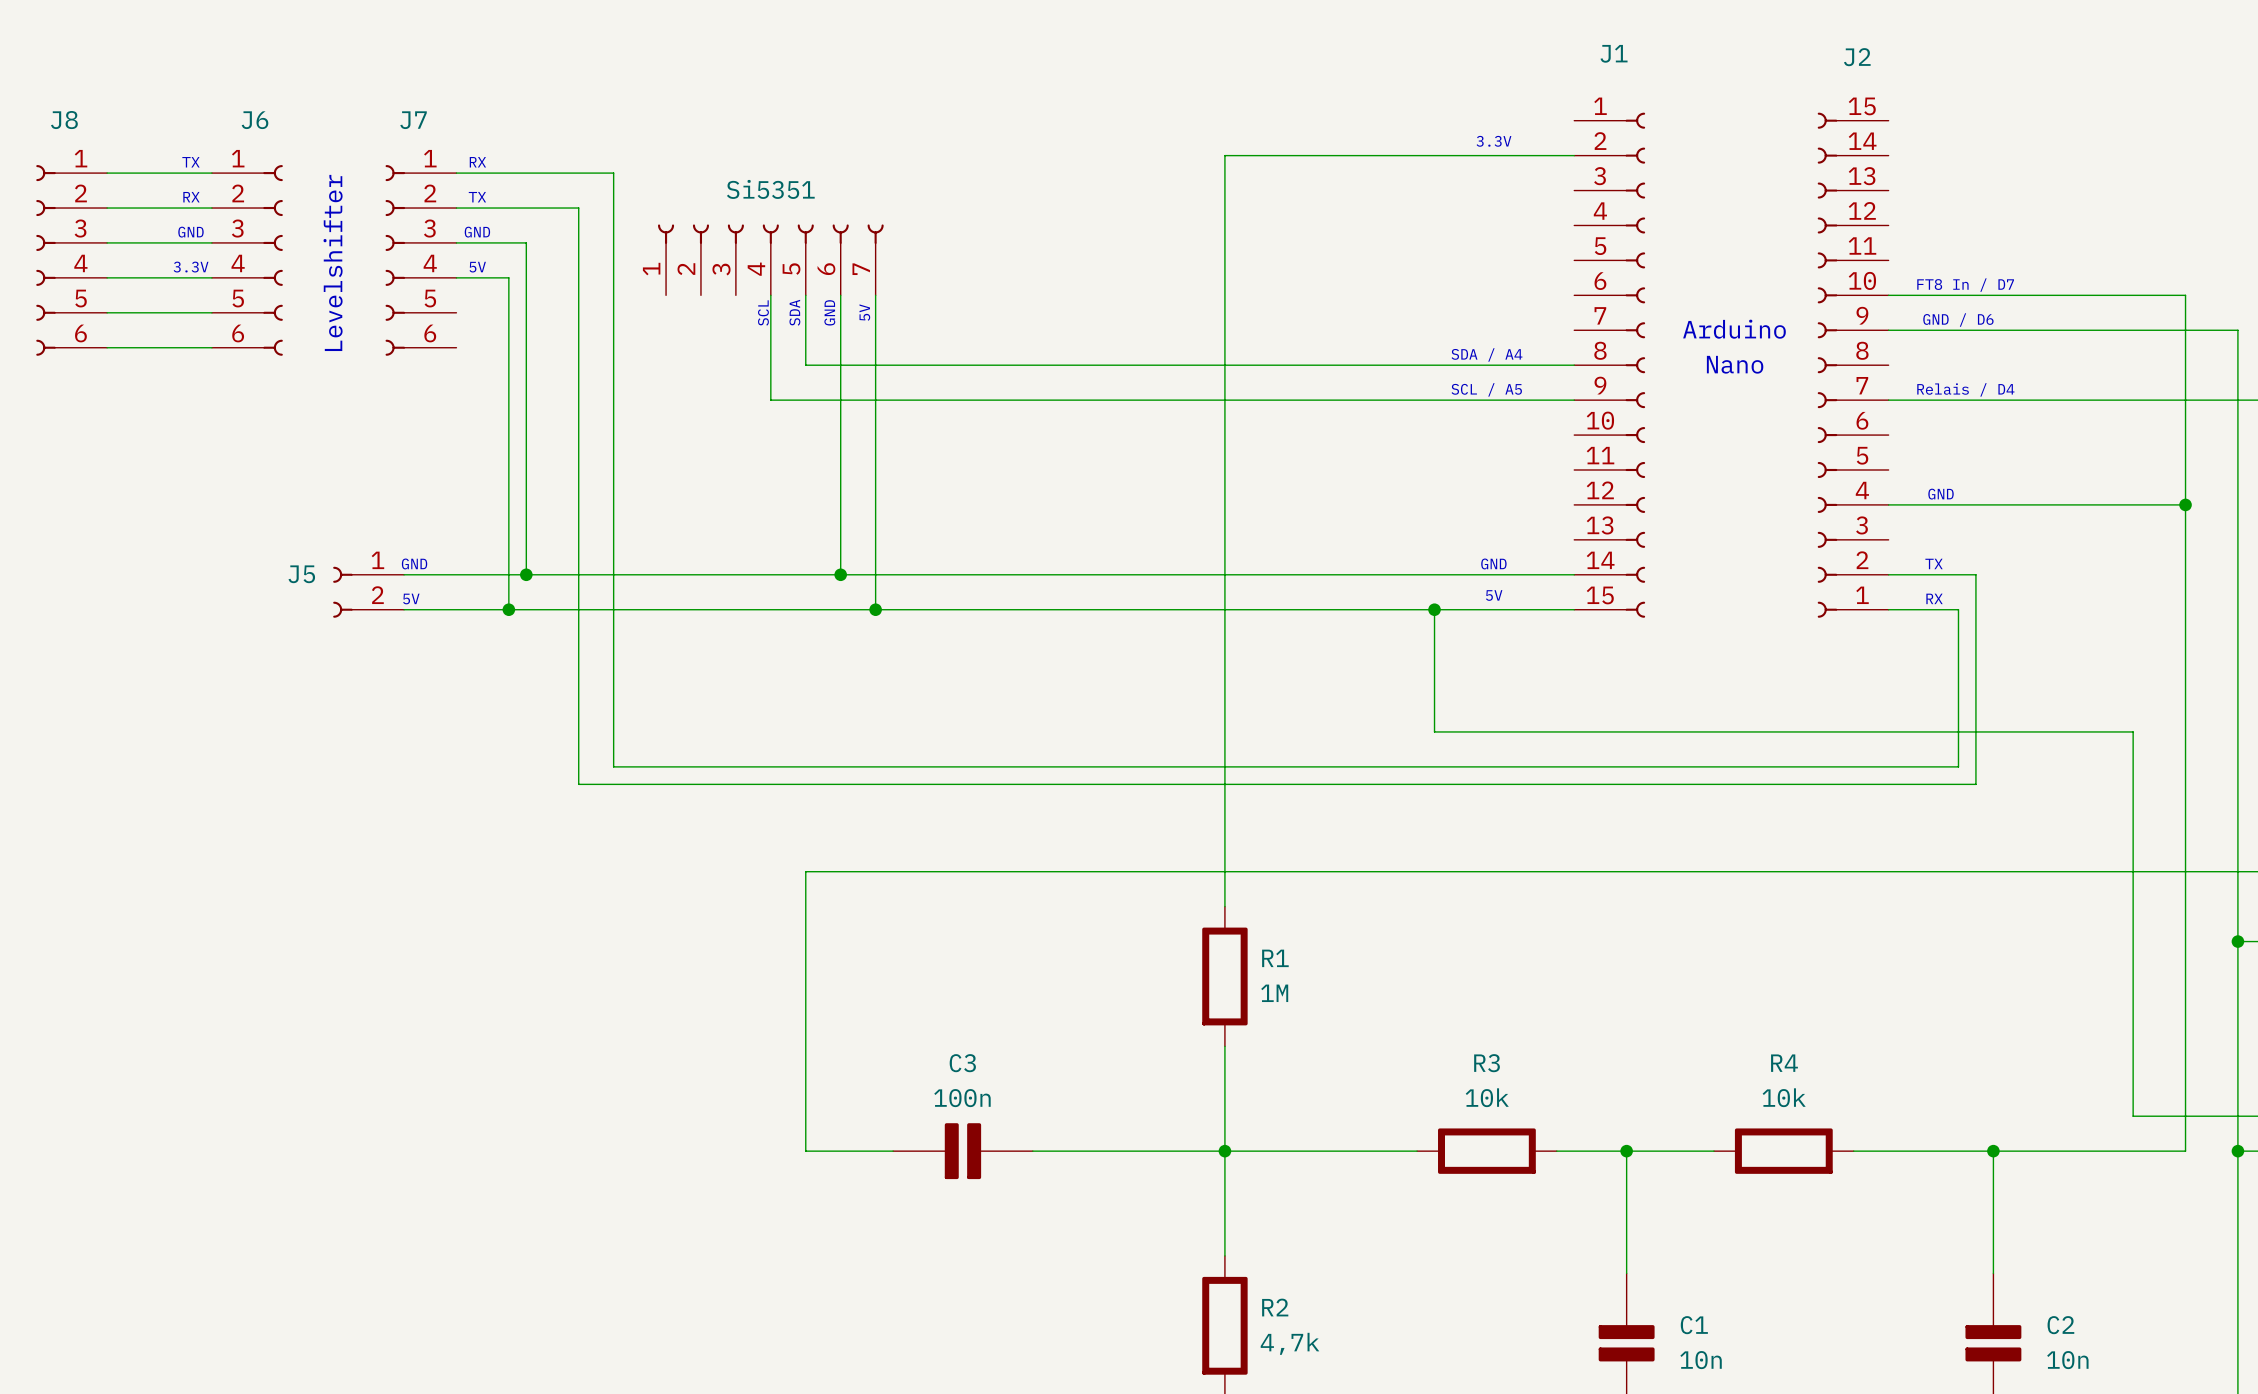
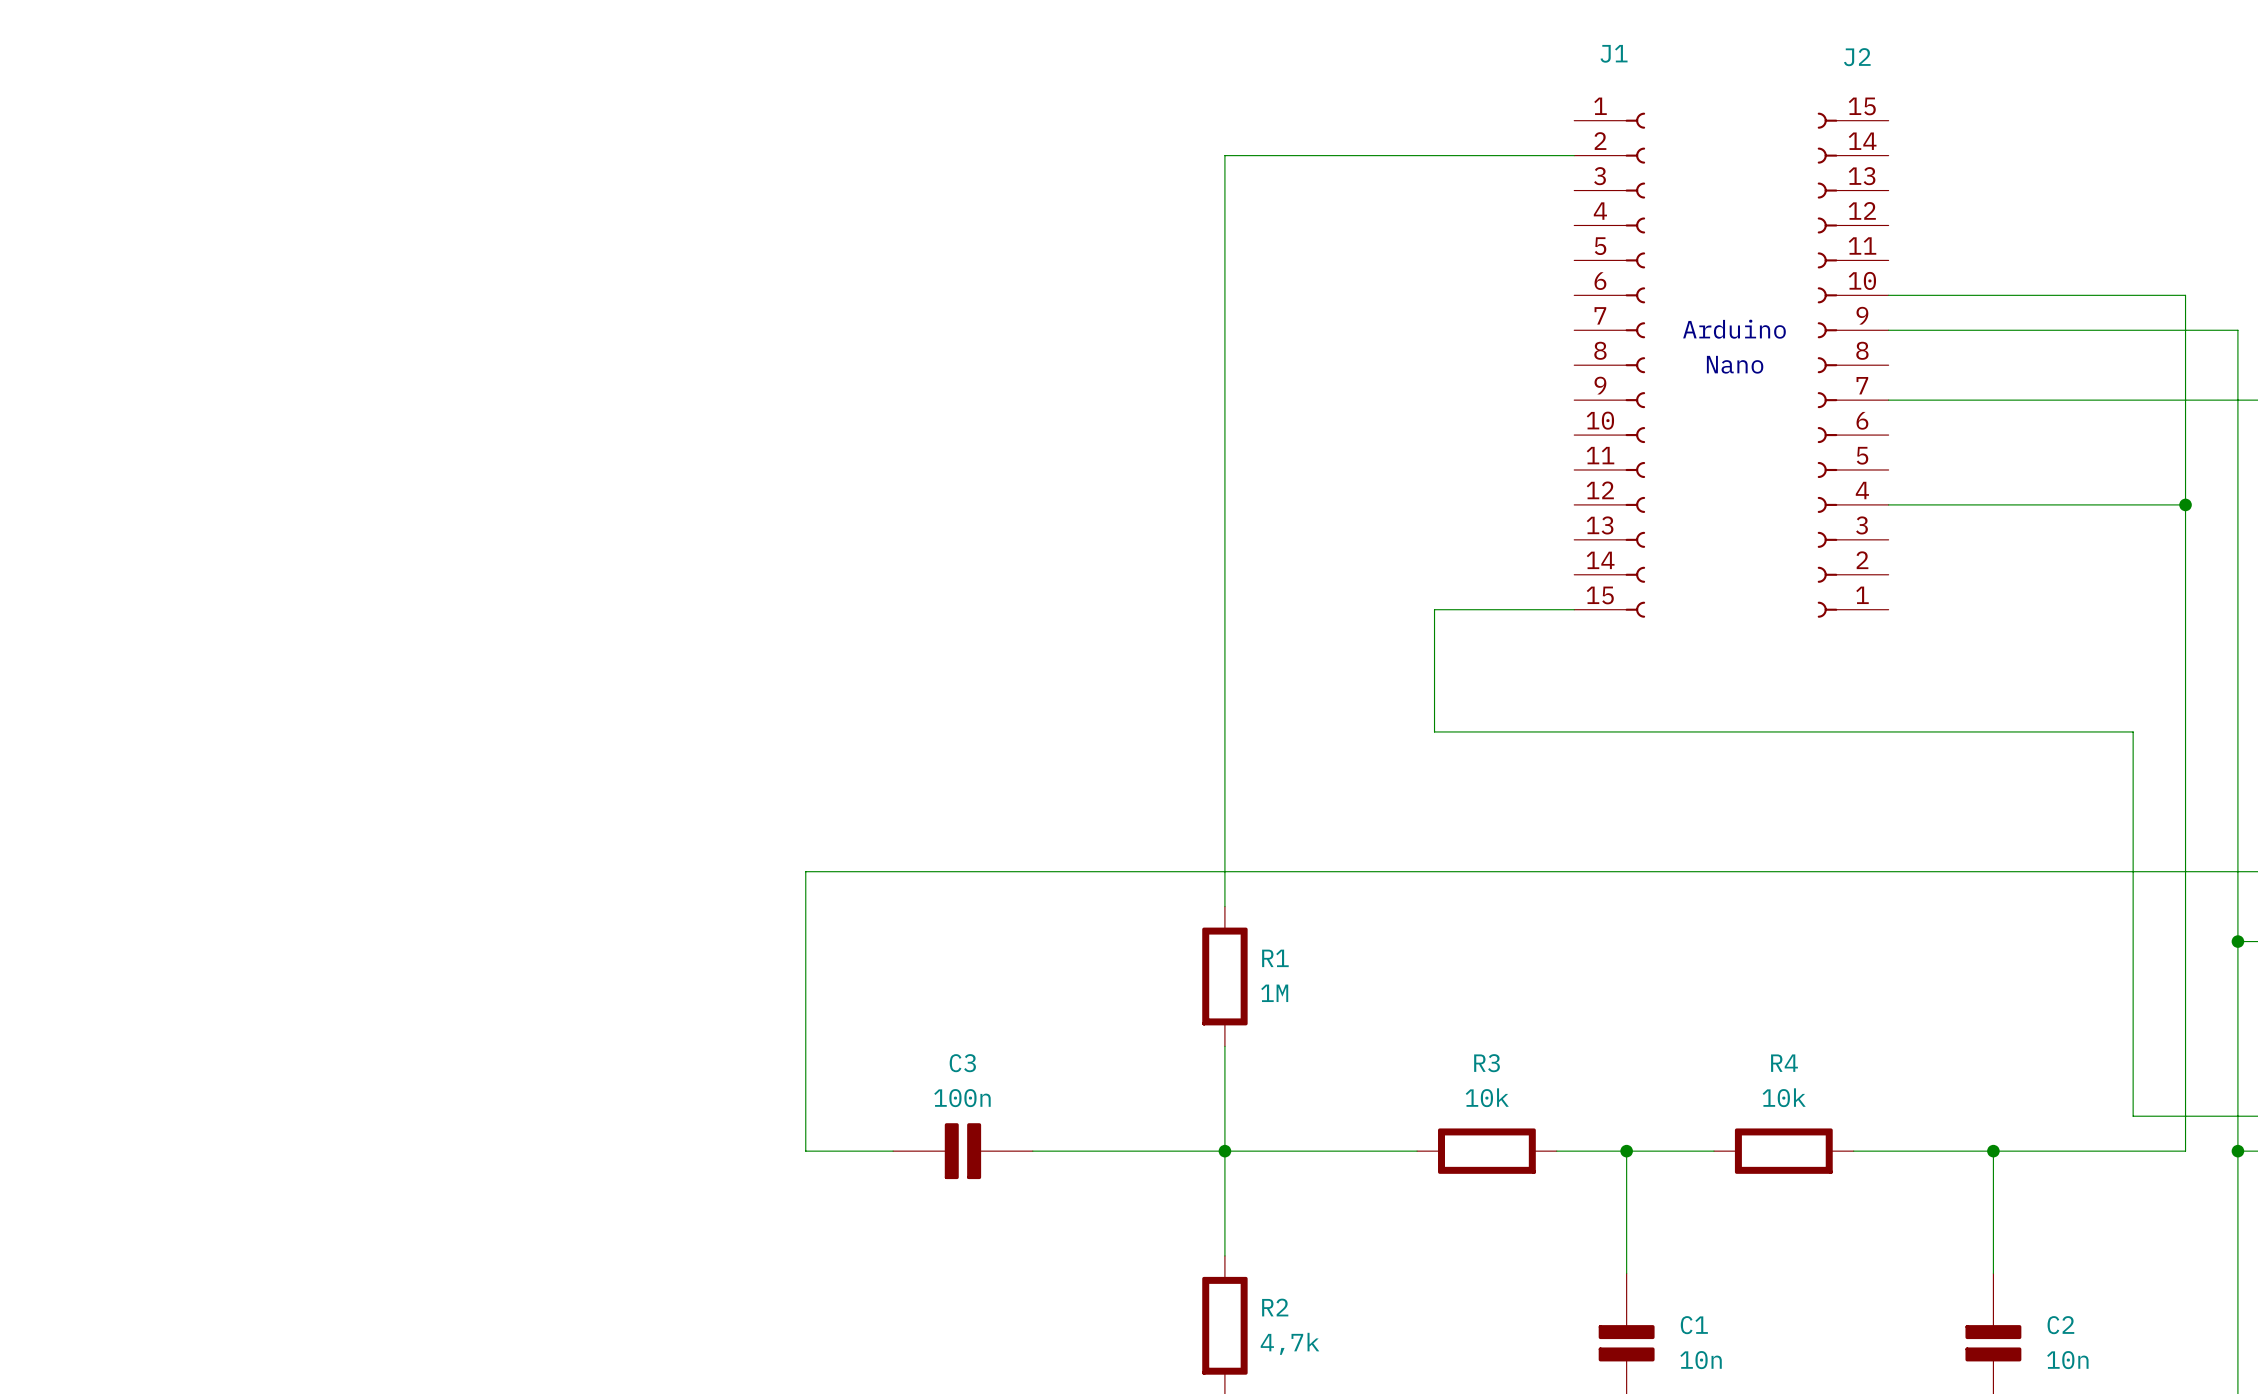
text: 3.3V (1493, 141) -> none
text: TX (190, 162) -> none
text: RX (477, 162) -> none
wire: (107, 173) (211, 173) -> none
wire: (456, 173) (613, 173) (613, 766) (1958, 766) (1958, 609) (1888, 609) -> none
text: RX (191, 197) -> none
text: TX (477, 197) -> none
wire: (107, 208) (211, 208) -> none
wire: (456, 208) (578, 208) (578, 784) (1975, 784) (1975, 574) (1888, 574) -> none
text: GND (190, 232) -> none
text: GND (477, 232) -> none
wire: (107, 242) (211, 242) -> none
wire: (456, 242) (526, 242) (526, 574) -> none
Si5351: (770, 259) -> none
J8: (71, 260) -> none
J6: (247, 260) -> none
J7: (421, 260) -> none
text: Levelshifter (333, 262) -> none
text: 3.3V (191, 267) -> none
text: 5V (477, 267) -> none
wire: (107, 277) (211, 277) -> none
wire: (456, 277) (508, 277) (508, 609) -> none
text: FT8 In / D7 (1965, 285) -> none
wire: (770, 295) (770, 400) (1574, 400) -> none
wire: (805, 295) (805, 365) (1574, 365) -> none
wire: (840, 295) (840, 574) -> none
wire: (875, 295) (875, 609) -> none
wire: (107, 312) (211, 312) -> none
text: SDA (794, 312) -> none
text: GND (829, 312) -> none
text: 5V (864, 312) -> none
text: SCL (763, 313) -> none
text: GND / D6 (1958, 320) -> none
wire: (107, 347) (211, 347) -> none
text: SDA / A4 (1486, 354) -> none
text: SCL / A5 (1486, 389) -> none
text: Relais / D4 (1965, 389) -> none
text: GND (1941, 494) -> none
text: GND (414, 563) -> none
text: GND (1493, 563) -> none
text: TX (1934, 563) -> none
wire: (404, 574) (1574, 574) -> none
junction: (526, 574) -> none
junction: (840, 574) -> none
J5: (368, 592) -> none
text: 5V (1494, 595) -> none
text: 5V (411, 598) -> none
text: RX (1934, 598) -> none
wire: (404, 609) (1434, 609) -> none
junction: (508, 609) -> none
junction: (875, 609) -> none
junction: (1434, 609) -> none

